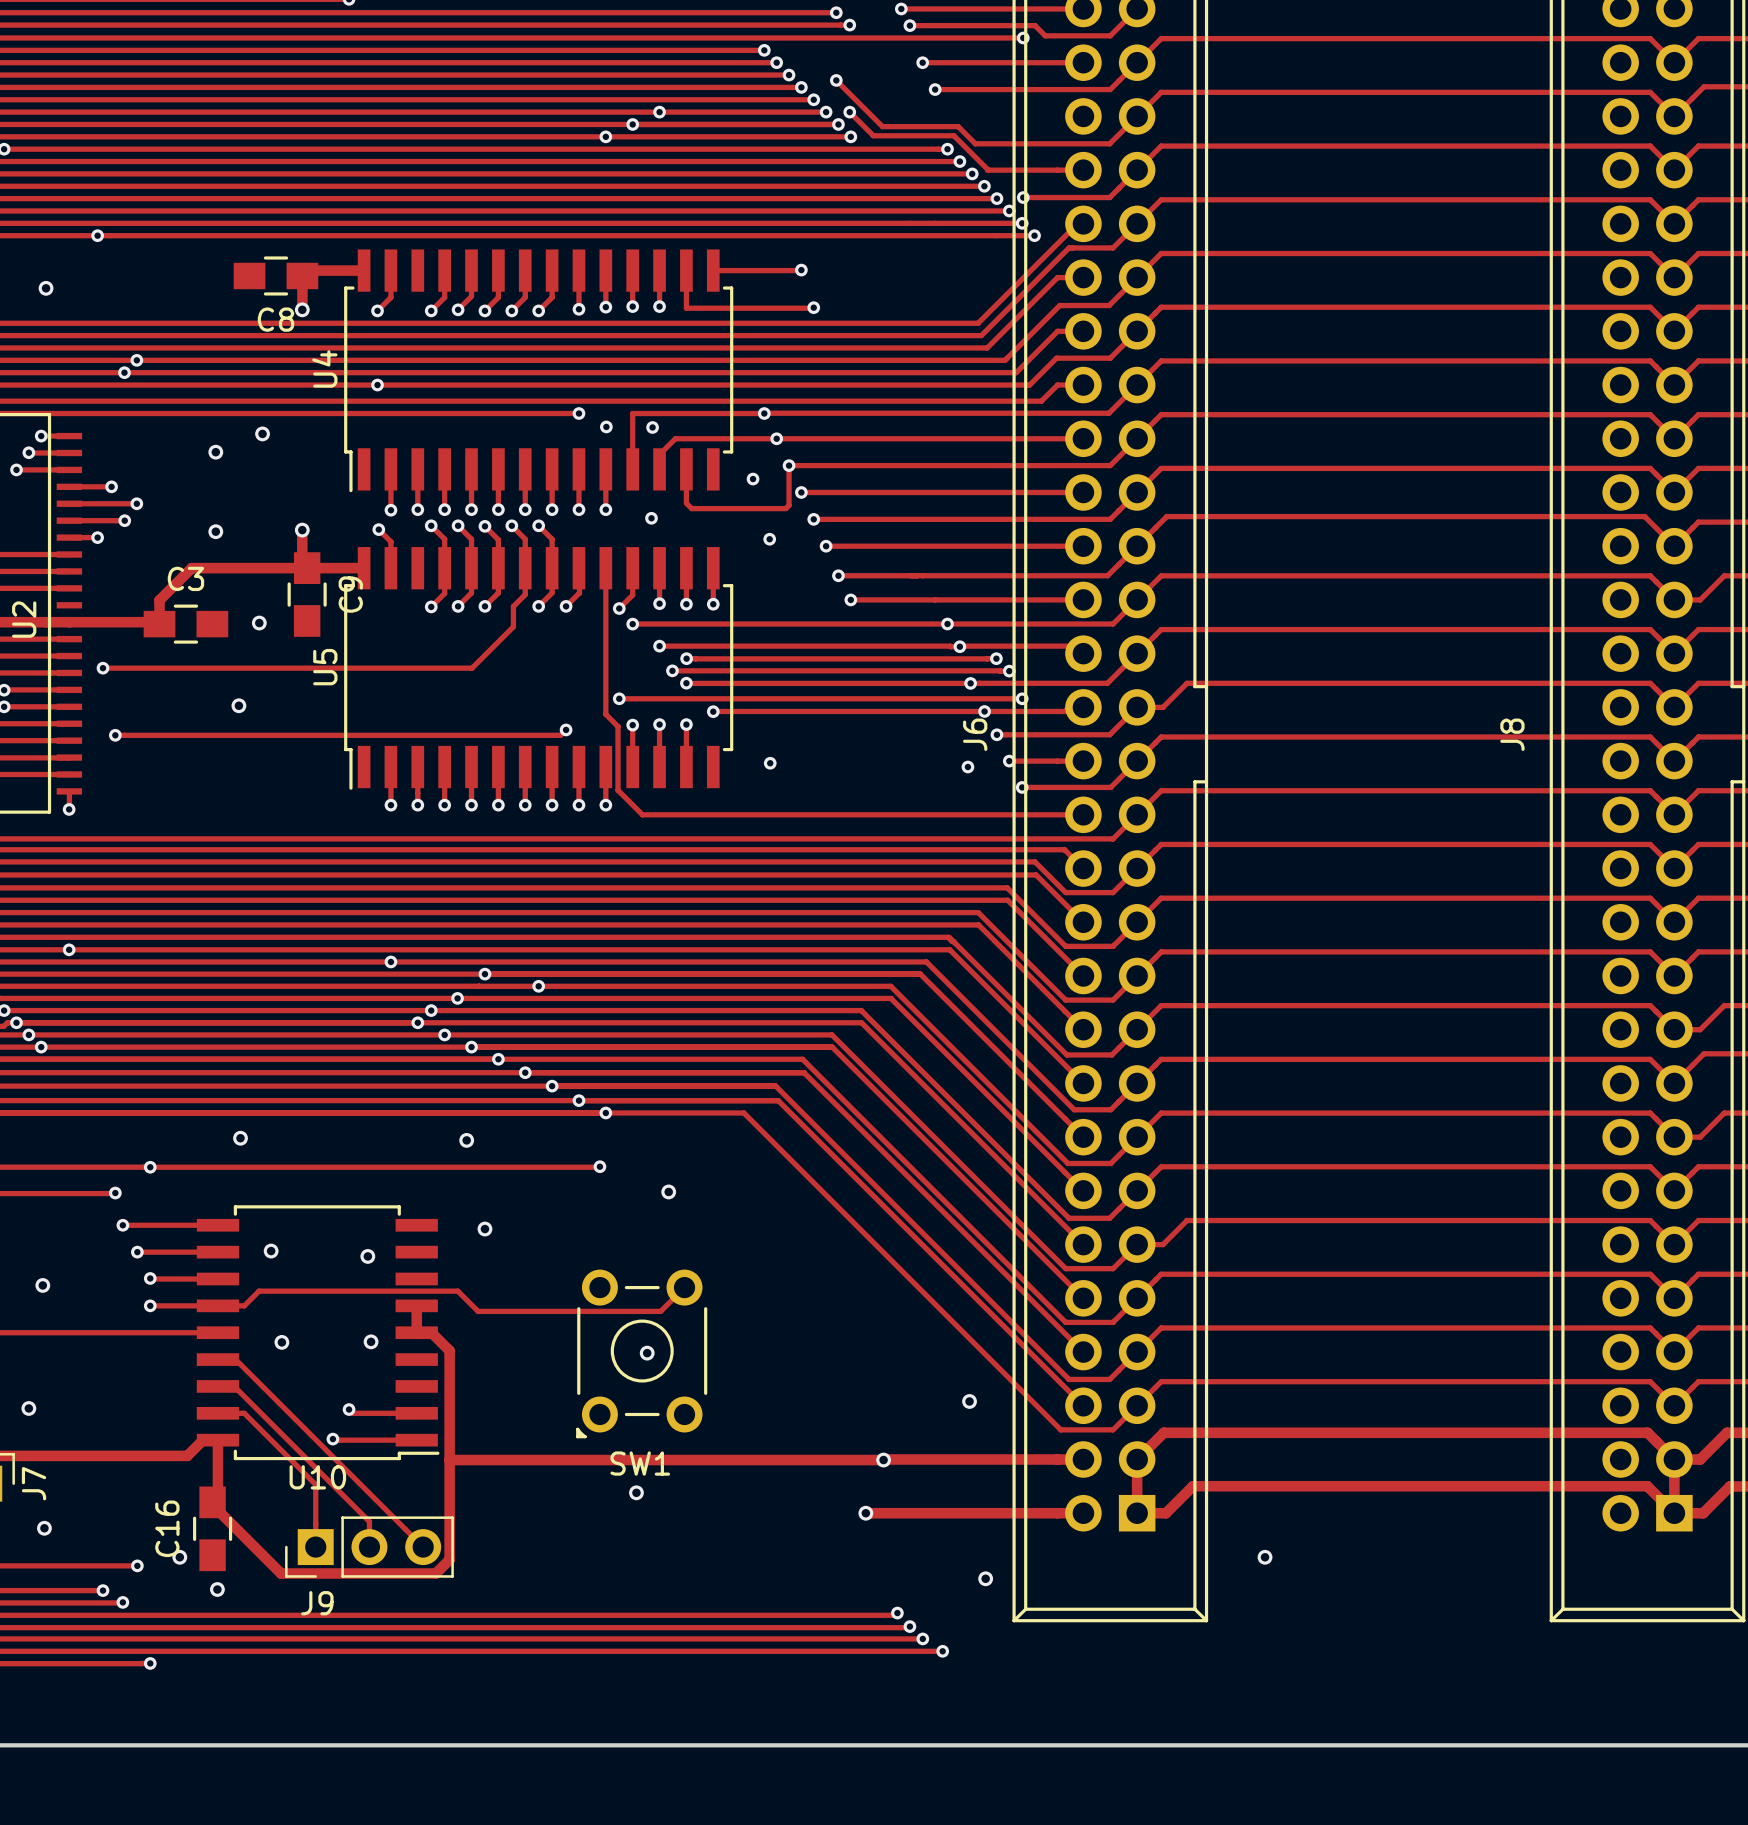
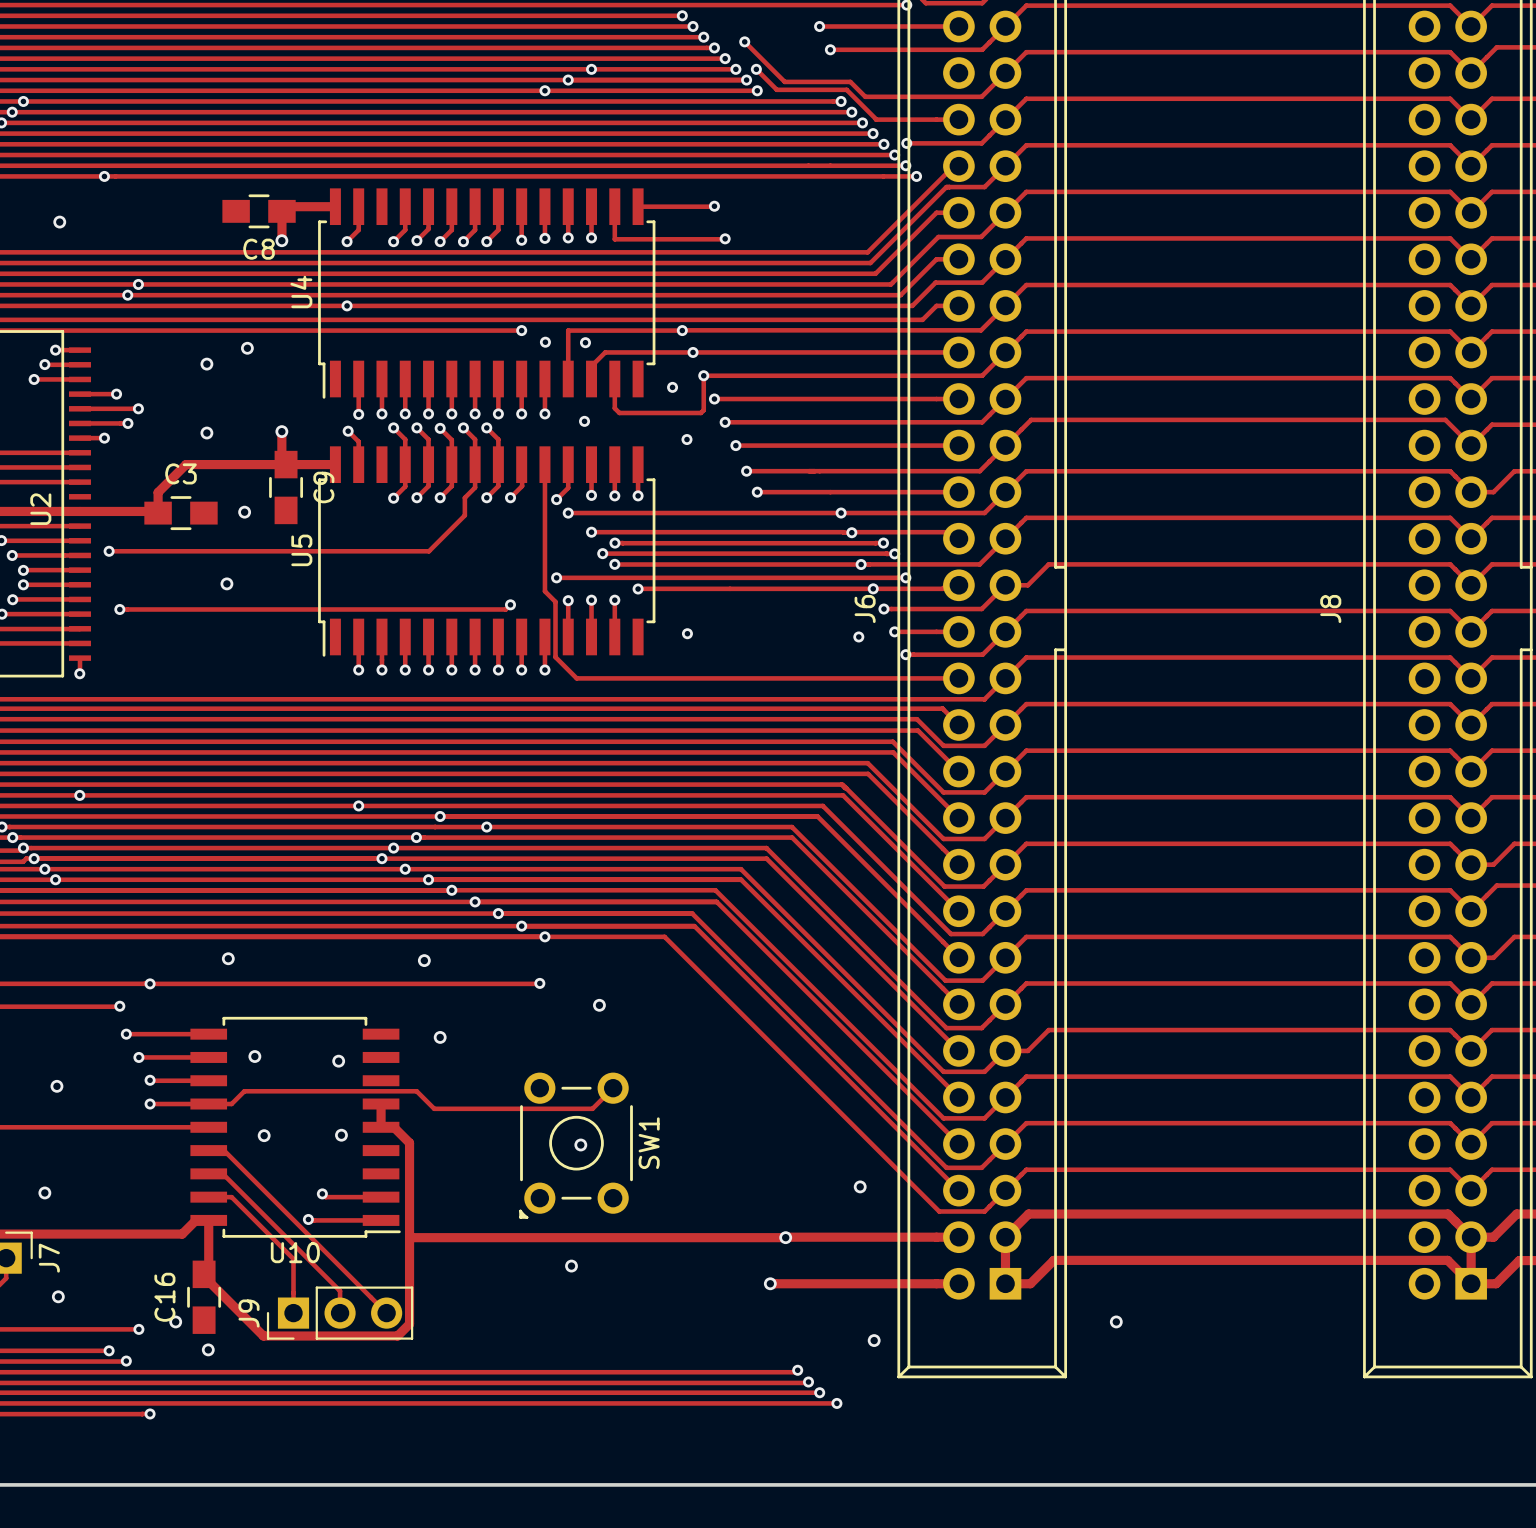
SW1 name rotation: 0° (640, 1463) -> 90° counterclockwise (649, 1143)
SW1 name position: SW1 (640, 1463) -> SW1 (649, 1143)
J9 name rotation: 0° (317, 1603) -> 90° counterclockwise (249, 1313)
J9 name position: J9 (317, 1603) -> J9 (249, 1313)

